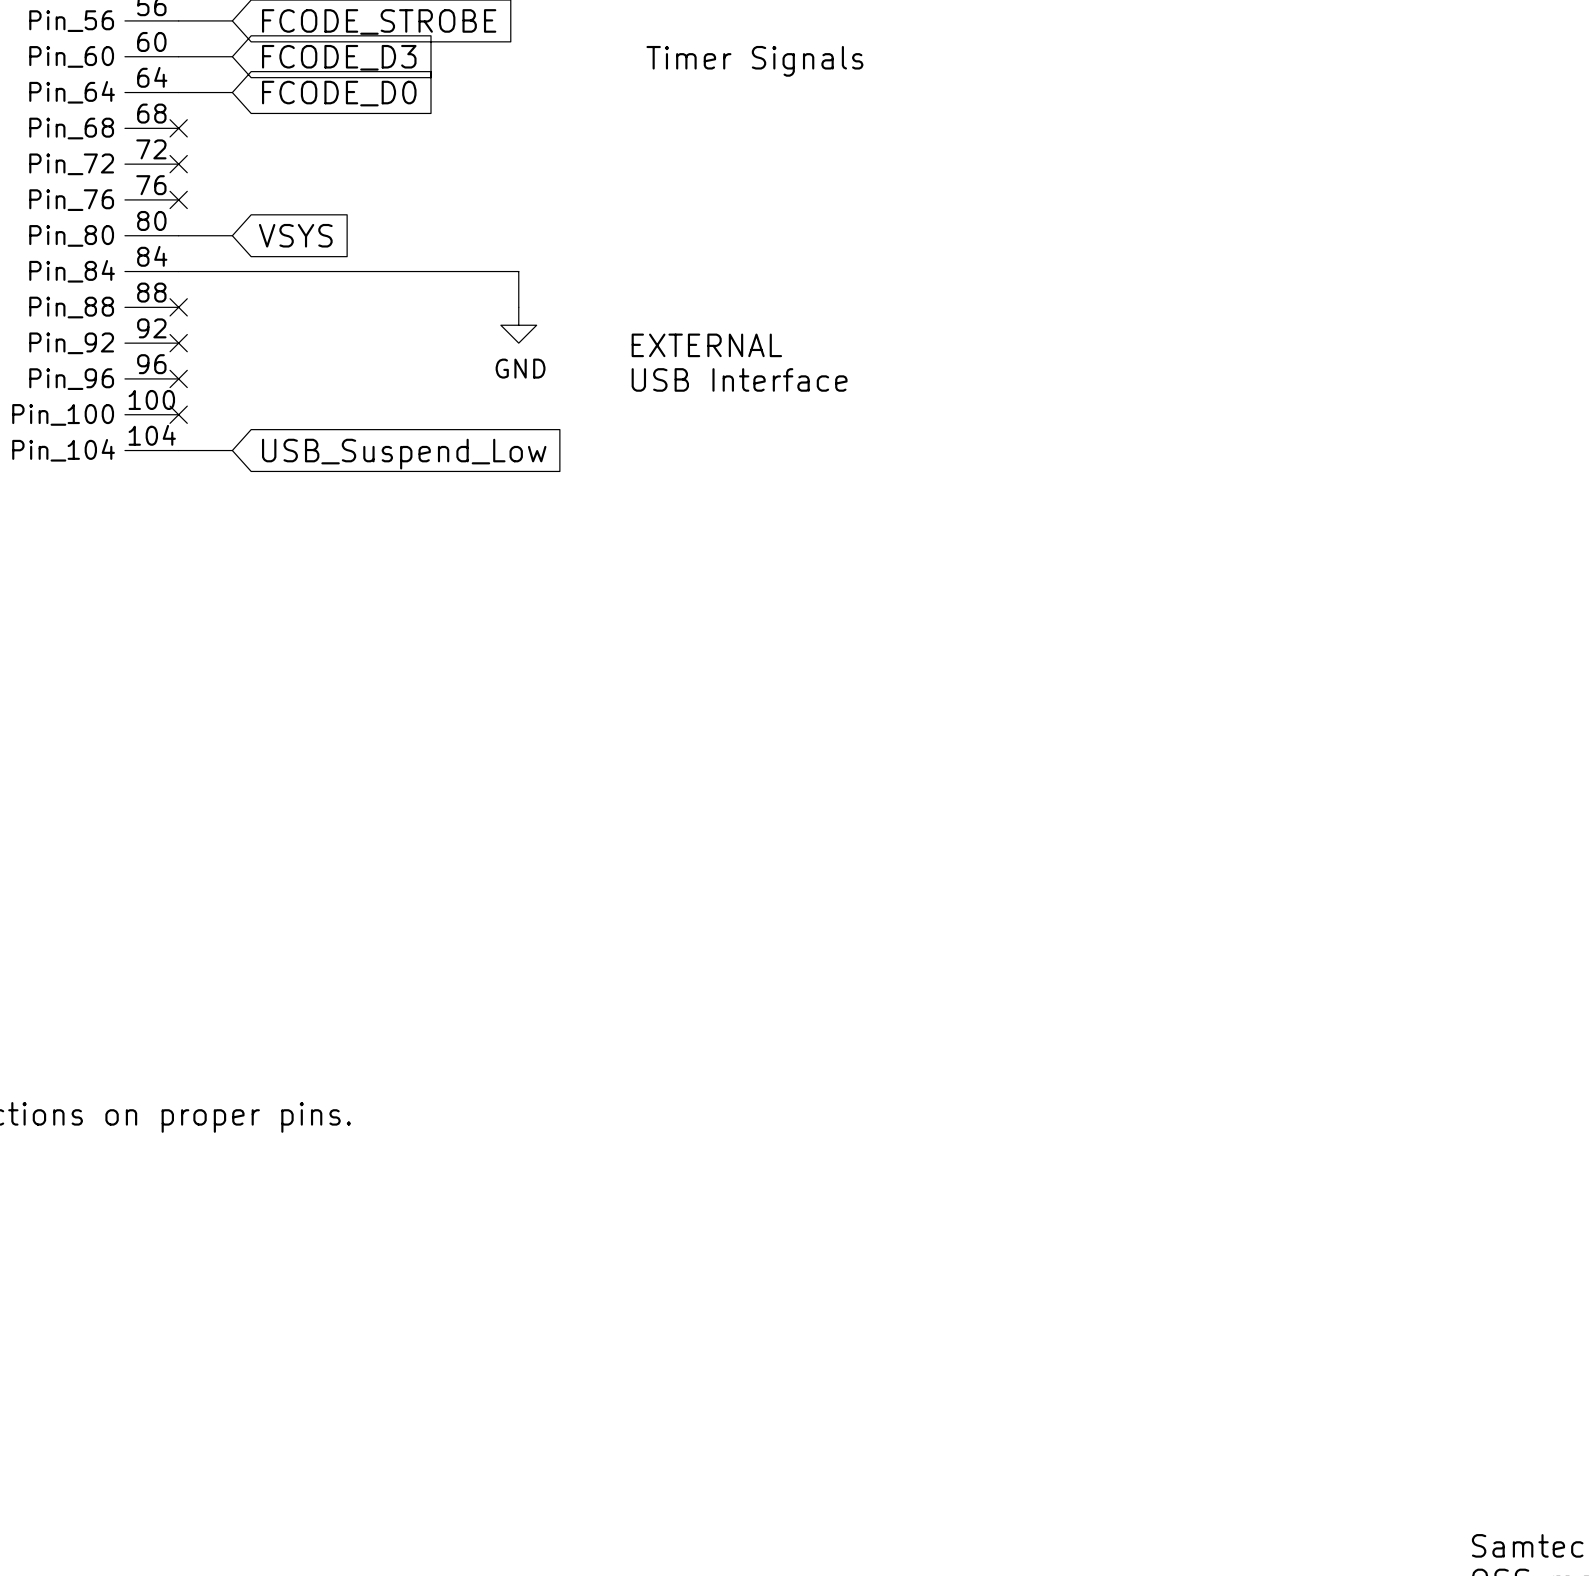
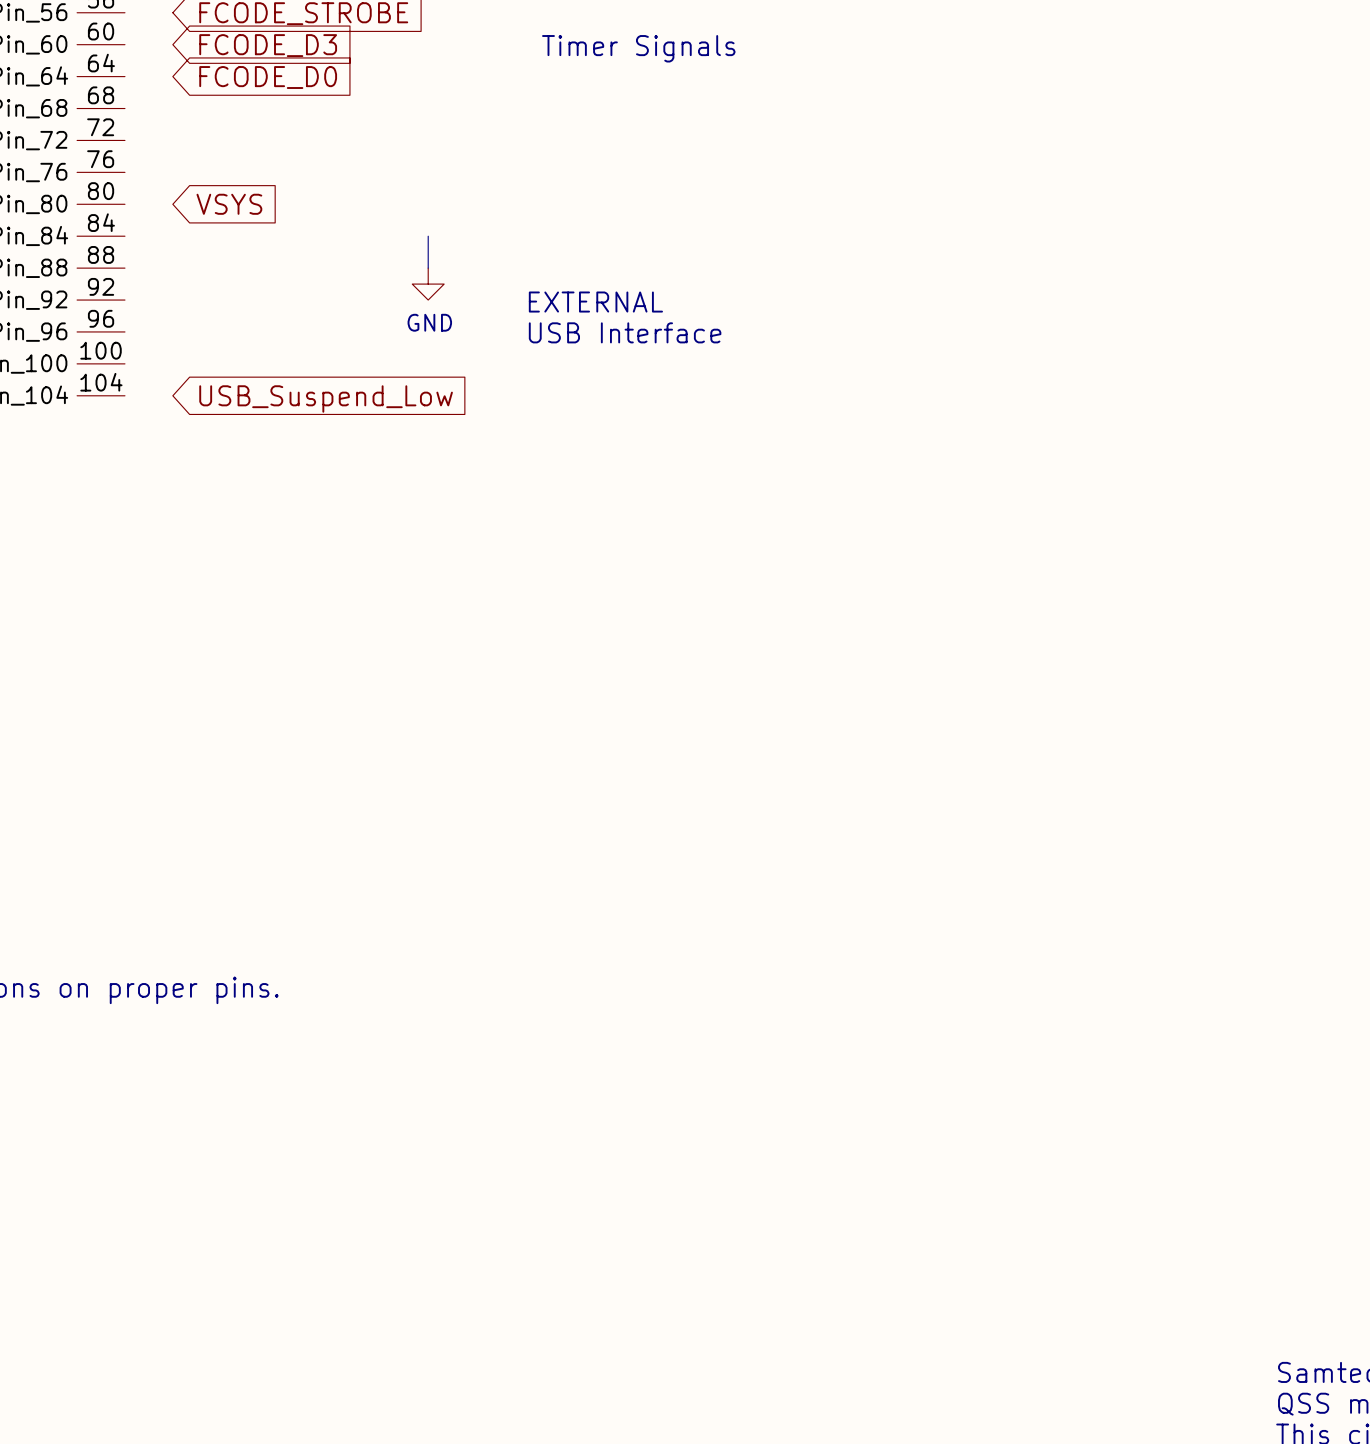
wire: (178, 20) (232, 20) -> none
wire: (178, 56) (232, 56) -> none
wire: (178, 92) (232, 92) -> none
no-connect mark: (178, 128) -> none
no-connect mark: (178, 164) -> none
no-connect mark: (178, 199) -> none
wire: (178, 235) (232, 235) -> none
wire: (178, 271) (518, 271) -> none
no-connect mark: (178, 307) -> none
no-connect mark: (178, 343) -> none
no-connect mark: (178, 378) -> none
no-connect mark: (178, 414) -> none
wire: (178, 450) (232, 450) -> none

